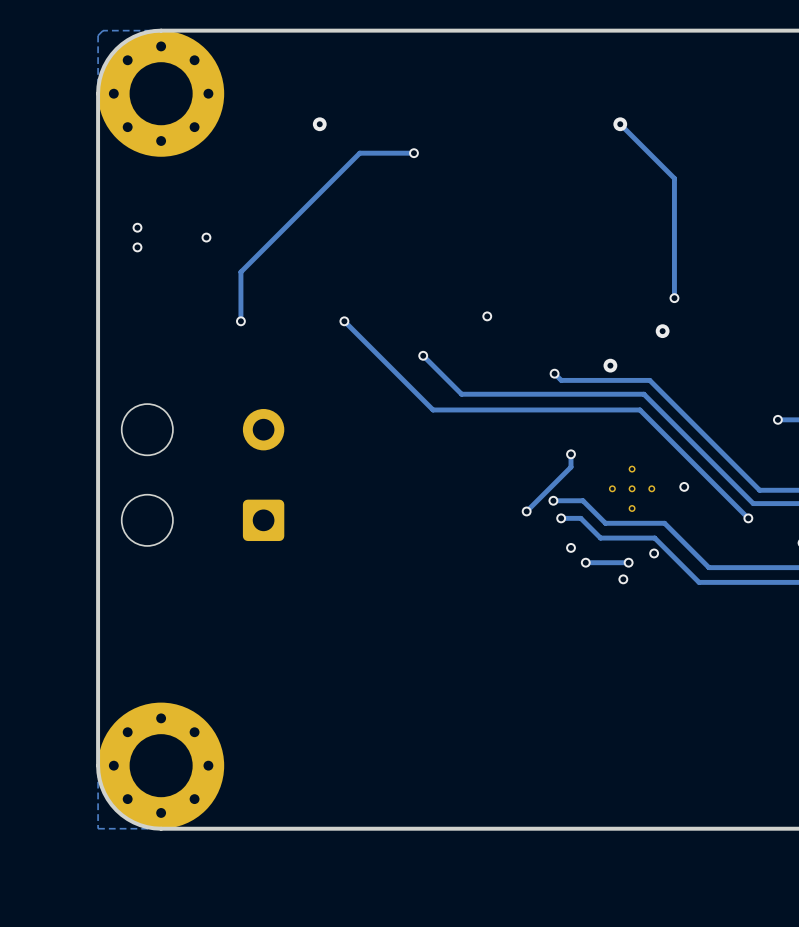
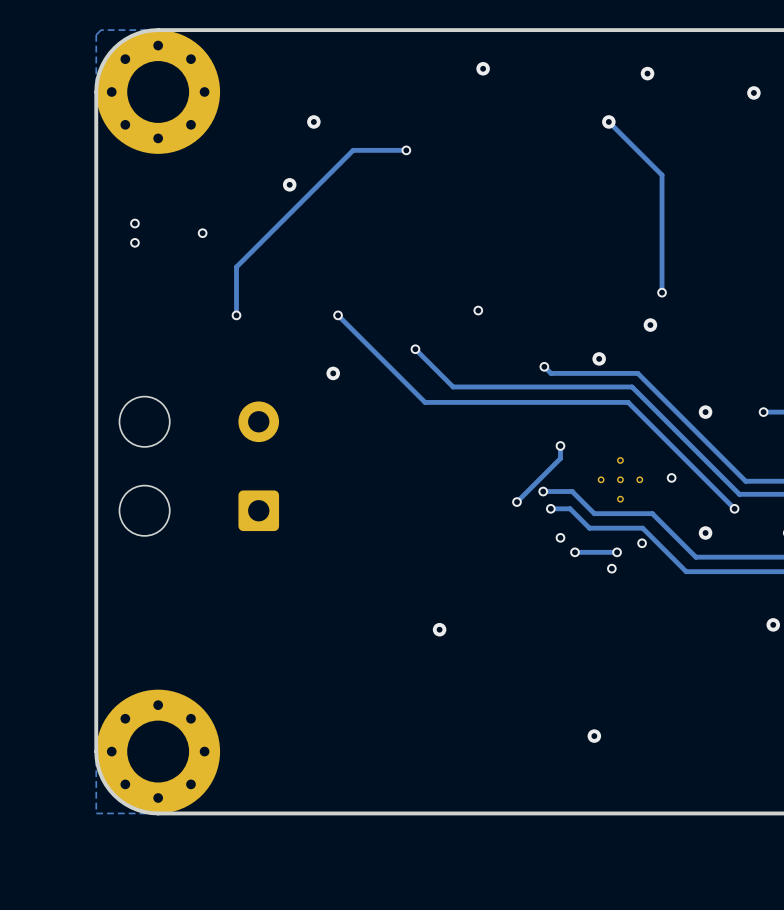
via: none -> (483, 68)
via: none -> (647, 73)
via: none -> (753, 92)
via: none -> (289, 184)
via: none -> (333, 373)
via: none -> (705, 412)
via: none -> (705, 532)
via: none -> (773, 624)
via: none -> (439, 629)
via: none -> (594, 736)

